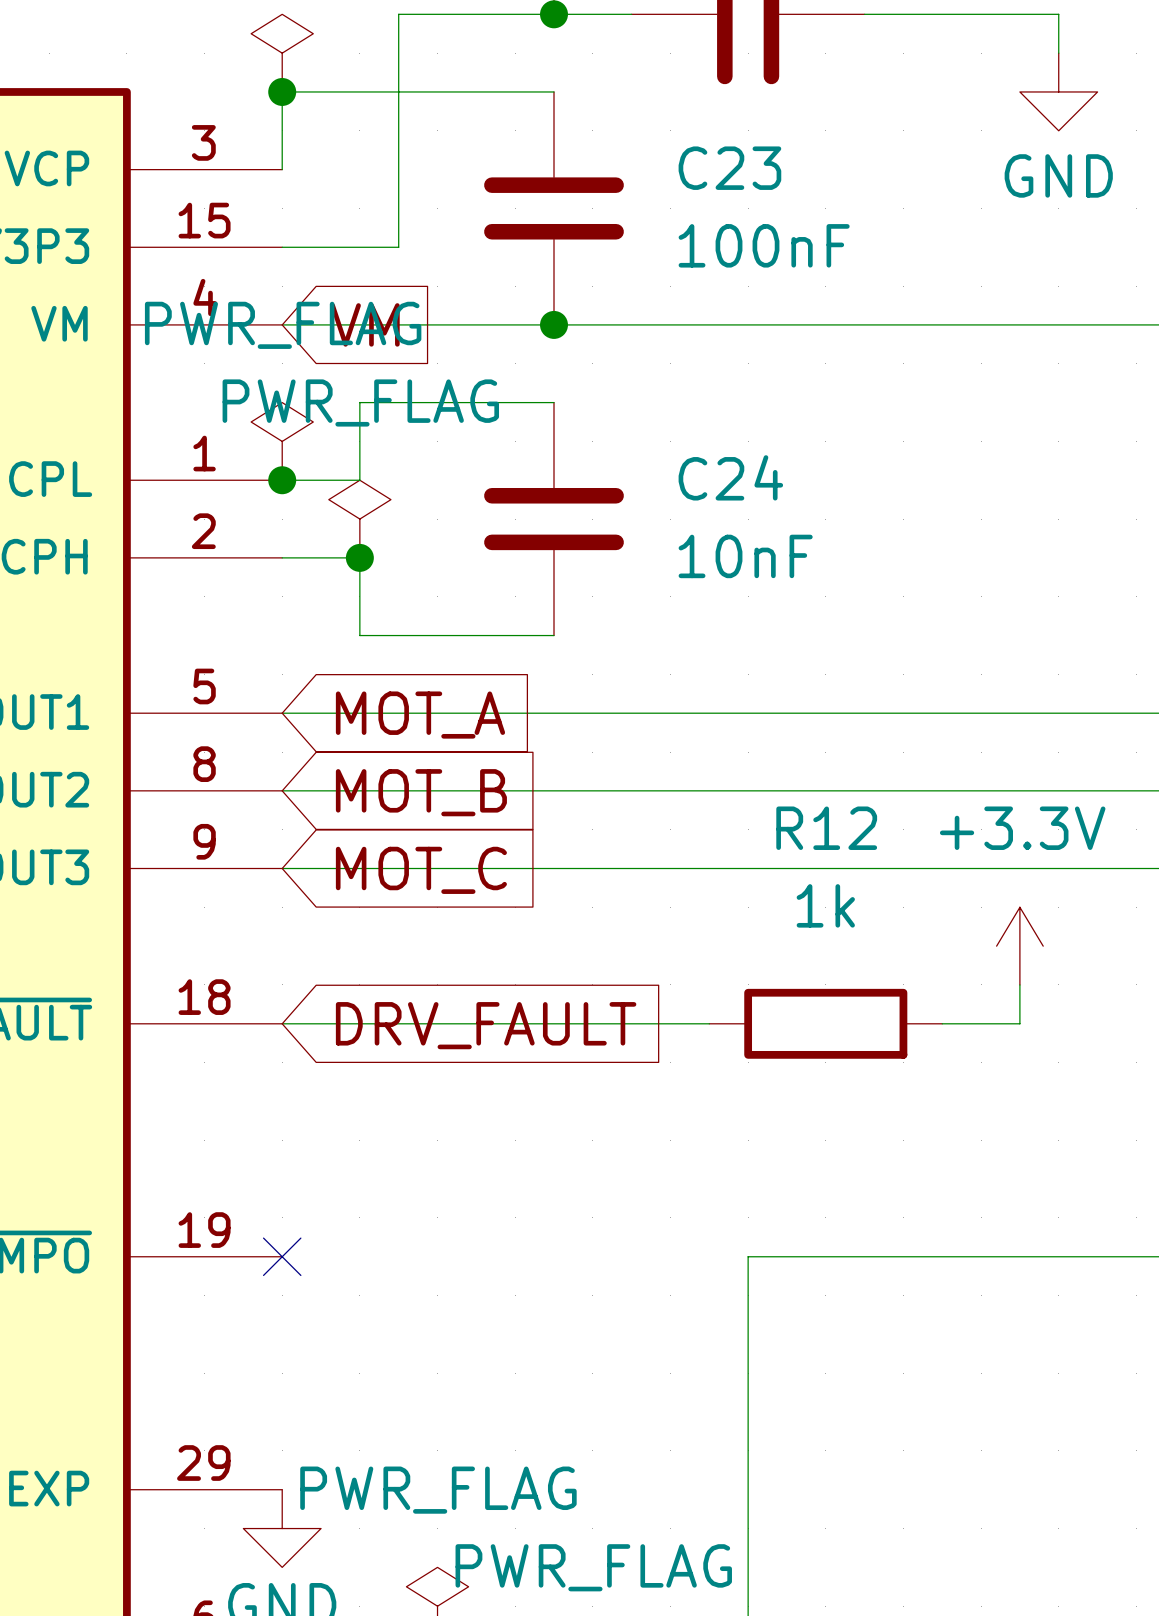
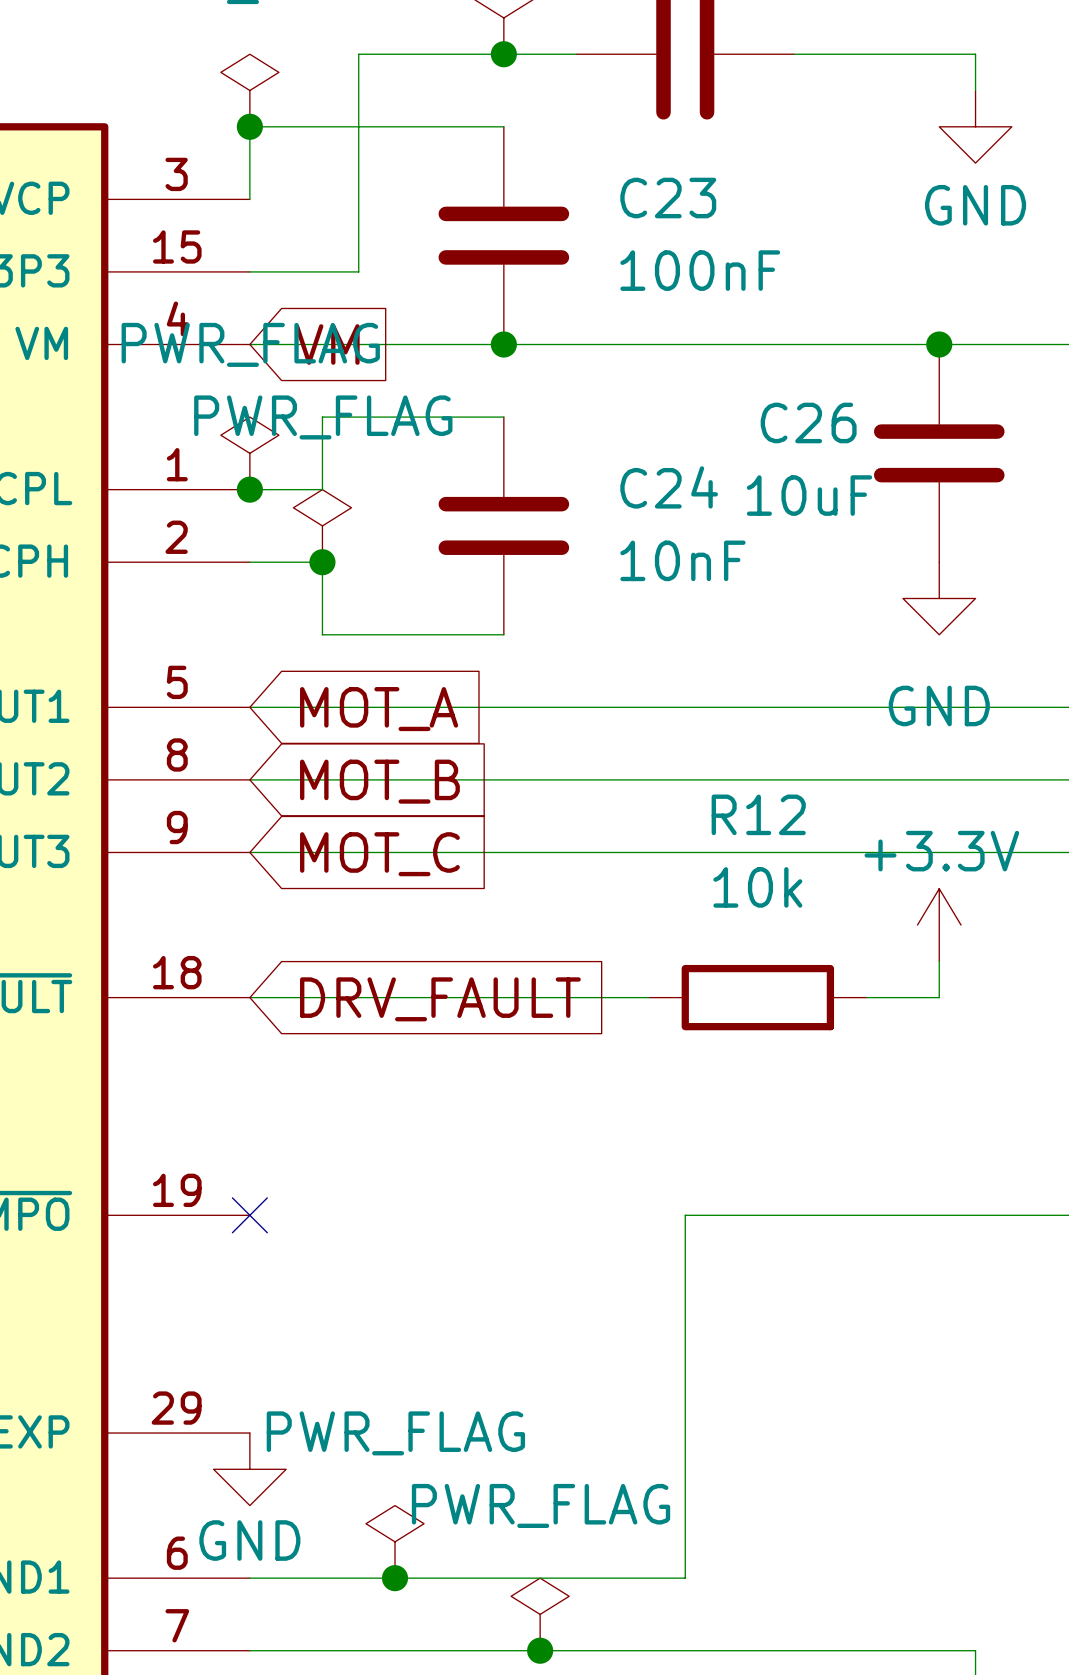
junction: none -> (939, 344)
C26: none -> 10uF (939, 453)
power symbol: none -> GND (939, 598)
power symbol text position: +3.3V (1022, 828) -> +3.3V (941, 851)
R12 value: 1k (825, 905) -> 10k (757, 887)

